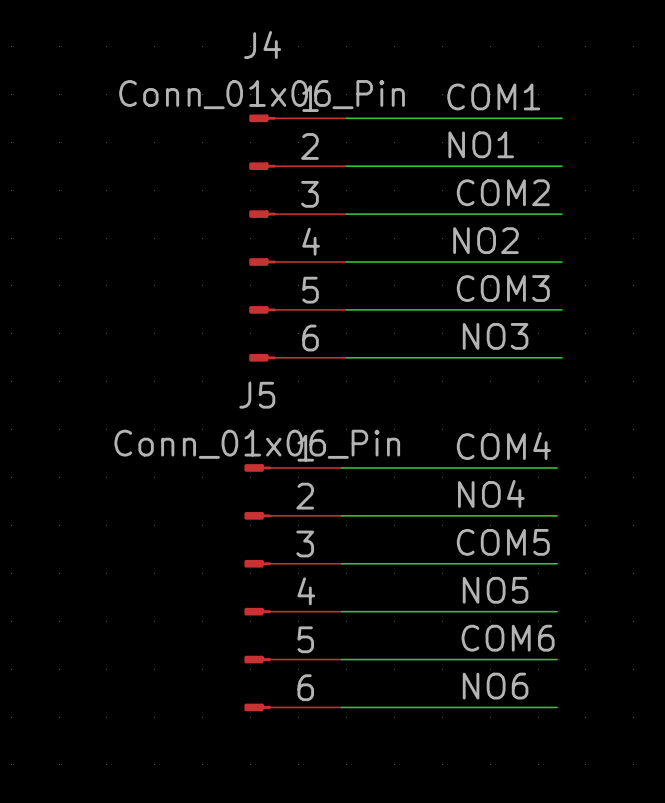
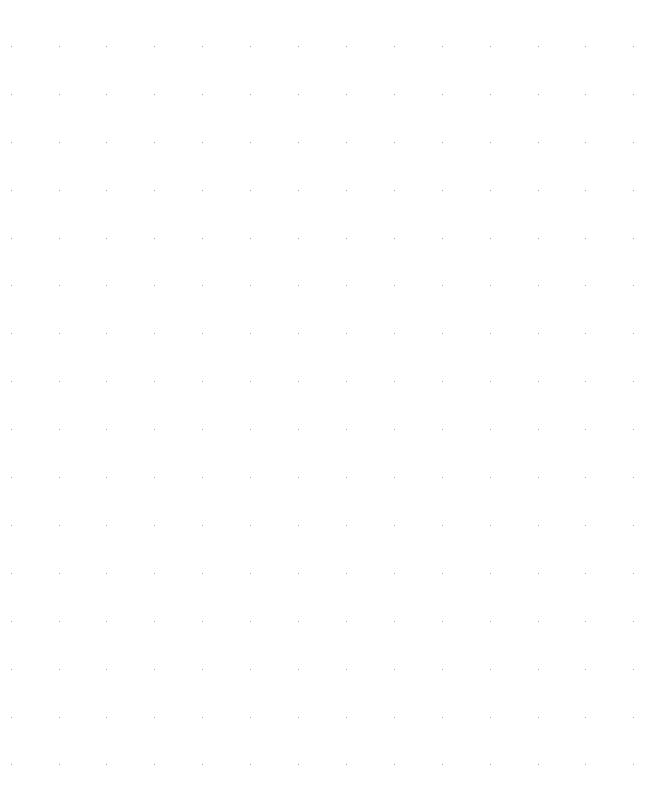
label: COM1 (493, 96) -> none
wire: (346, 118) (561, 118) -> none
label: NO1 (481, 144) -> none
wire: (346, 166) (561, 166) -> none
label: COM2 (503, 192) -> none
wire: (346, 214) (561, 214) -> none
J4: Conn_01x06_Pin (297, 238) -> none
label: NO2 (485, 240) -> none
wire: (346, 262) (561, 262) -> none
label: COM3 (503, 288) -> none
wire: (346, 309) (561, 309) -> none
label: NO3 (495, 336) -> none
wire: (346, 357) (561, 357) -> none
label: COM4 (503, 446) -> none
wire: (341, 467) (557, 467) -> none
label: NO4 (491, 493) -> none
wire: (341, 515) (557, 515) -> none
label: COM5 (503, 542) -> none
wire: (341, 563) (557, 563) -> none
J5: Conn_01x06_Pin (293, 587) -> none
label: NO5 (495, 590) -> none
wire: (341, 611) (557, 611) -> none
label: COM6 (508, 638) -> none
wire: (341, 659) (557, 659) -> none
label: NO6 (495, 686) -> none
wire: (341, 707) (557, 707) -> none

